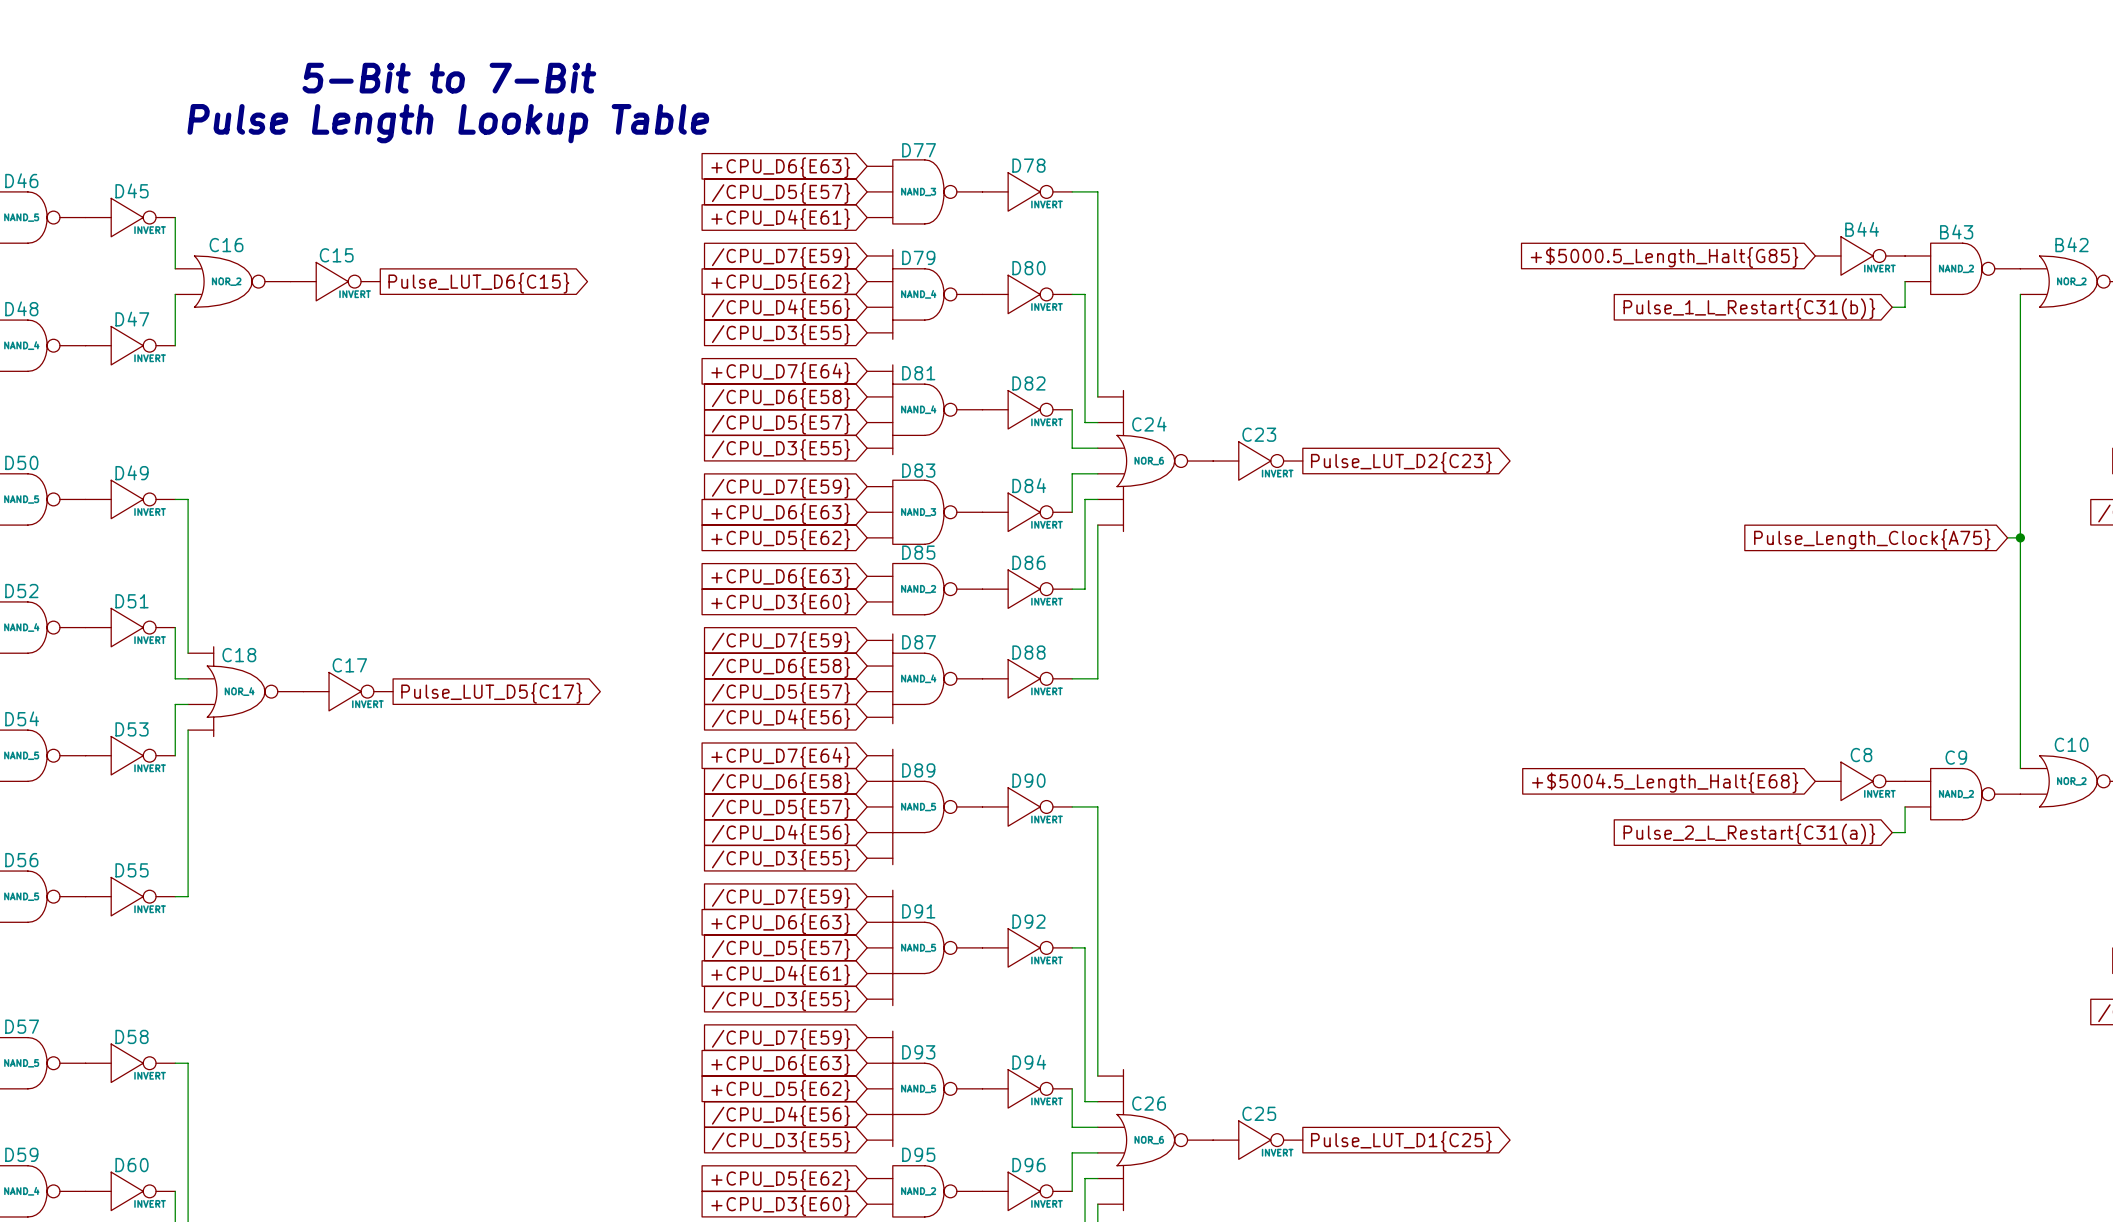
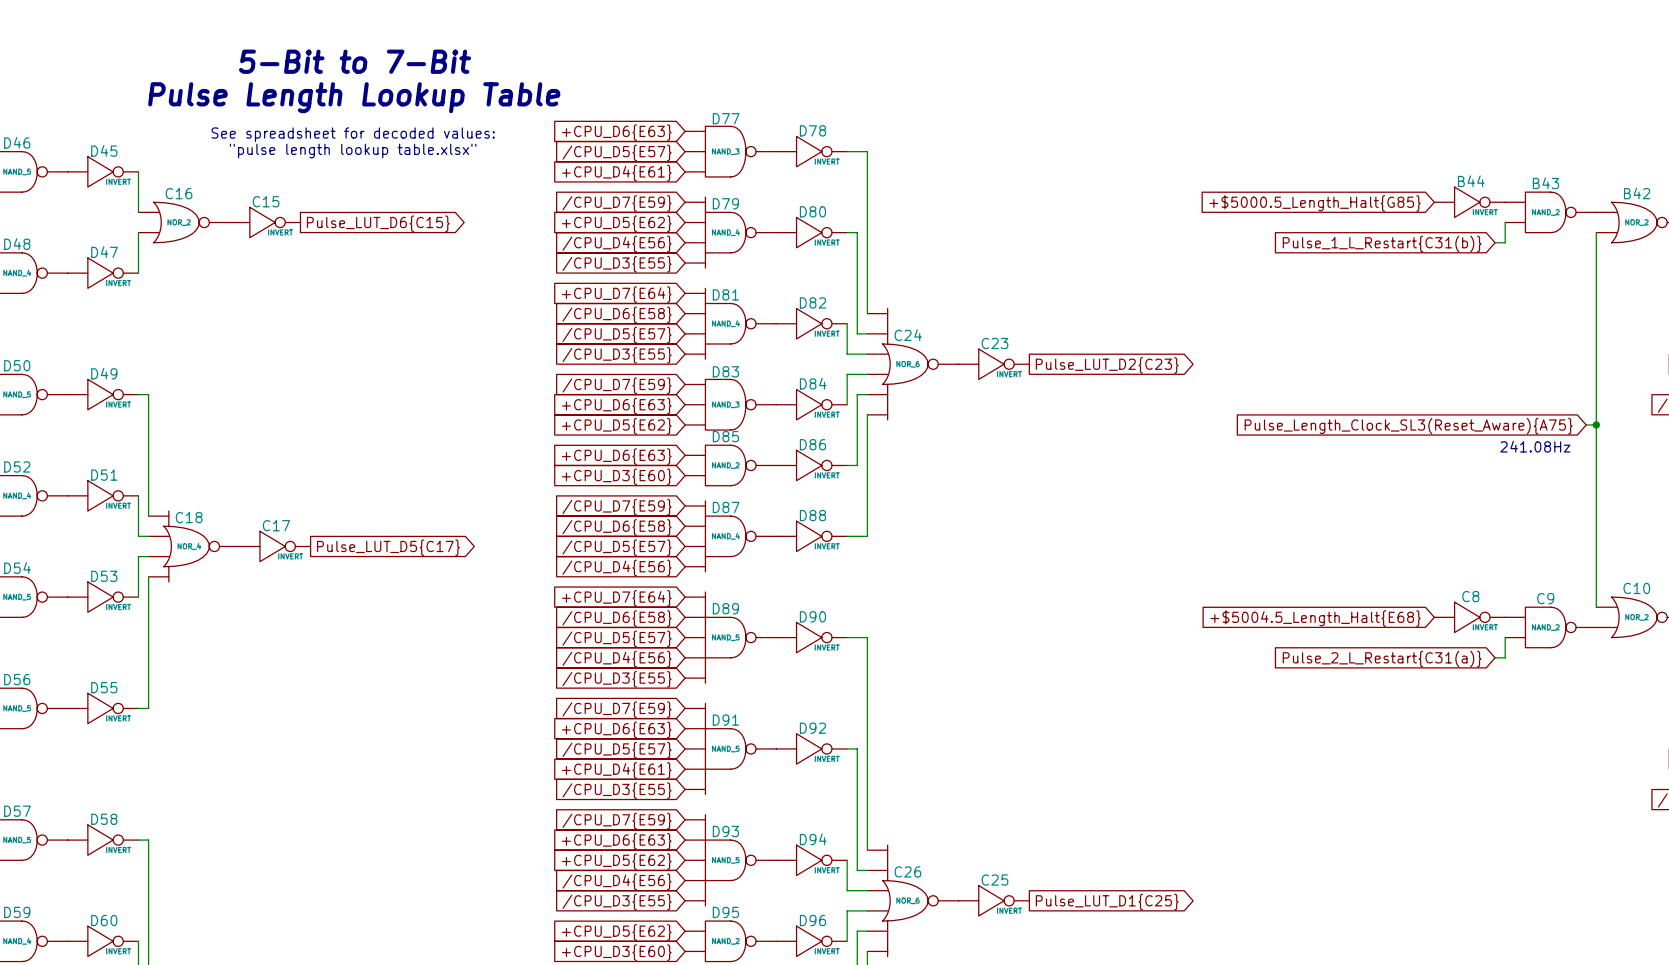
text: none -> See spreadsheet for decoded values: (353, 134)
text: none -> "pulse length lookup table.xlsx" (353, 151)
global label: Pulse_Length_Clock{A75} (1872, 539) -> Pulse_Length_Clock_SL3(Reset_Aware){A75} (1408, 426)
text: none -> 241.08Hz (1535, 446)

